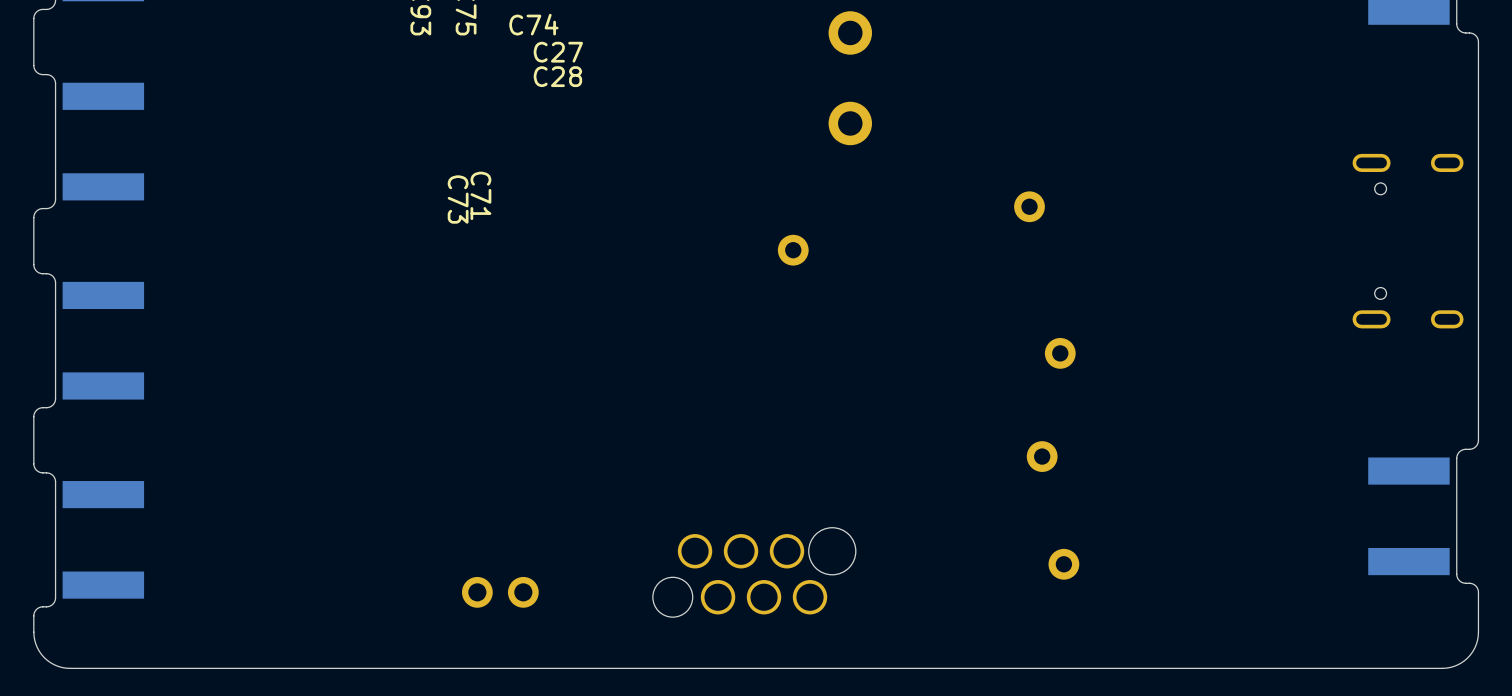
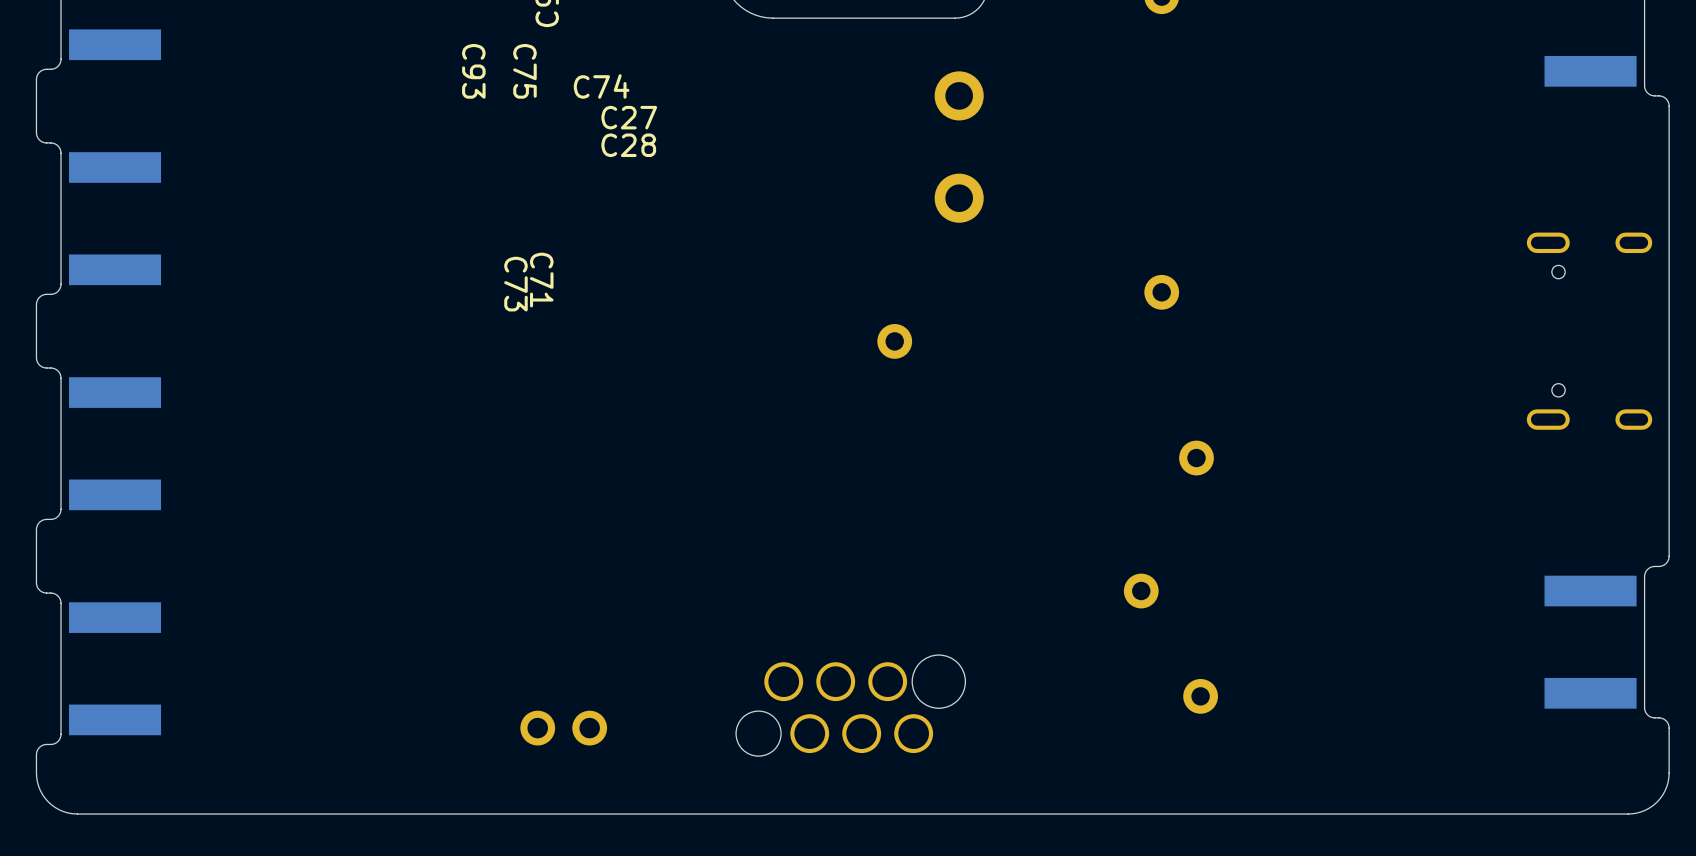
part position: (1042, 456) -> (1141, 591)

